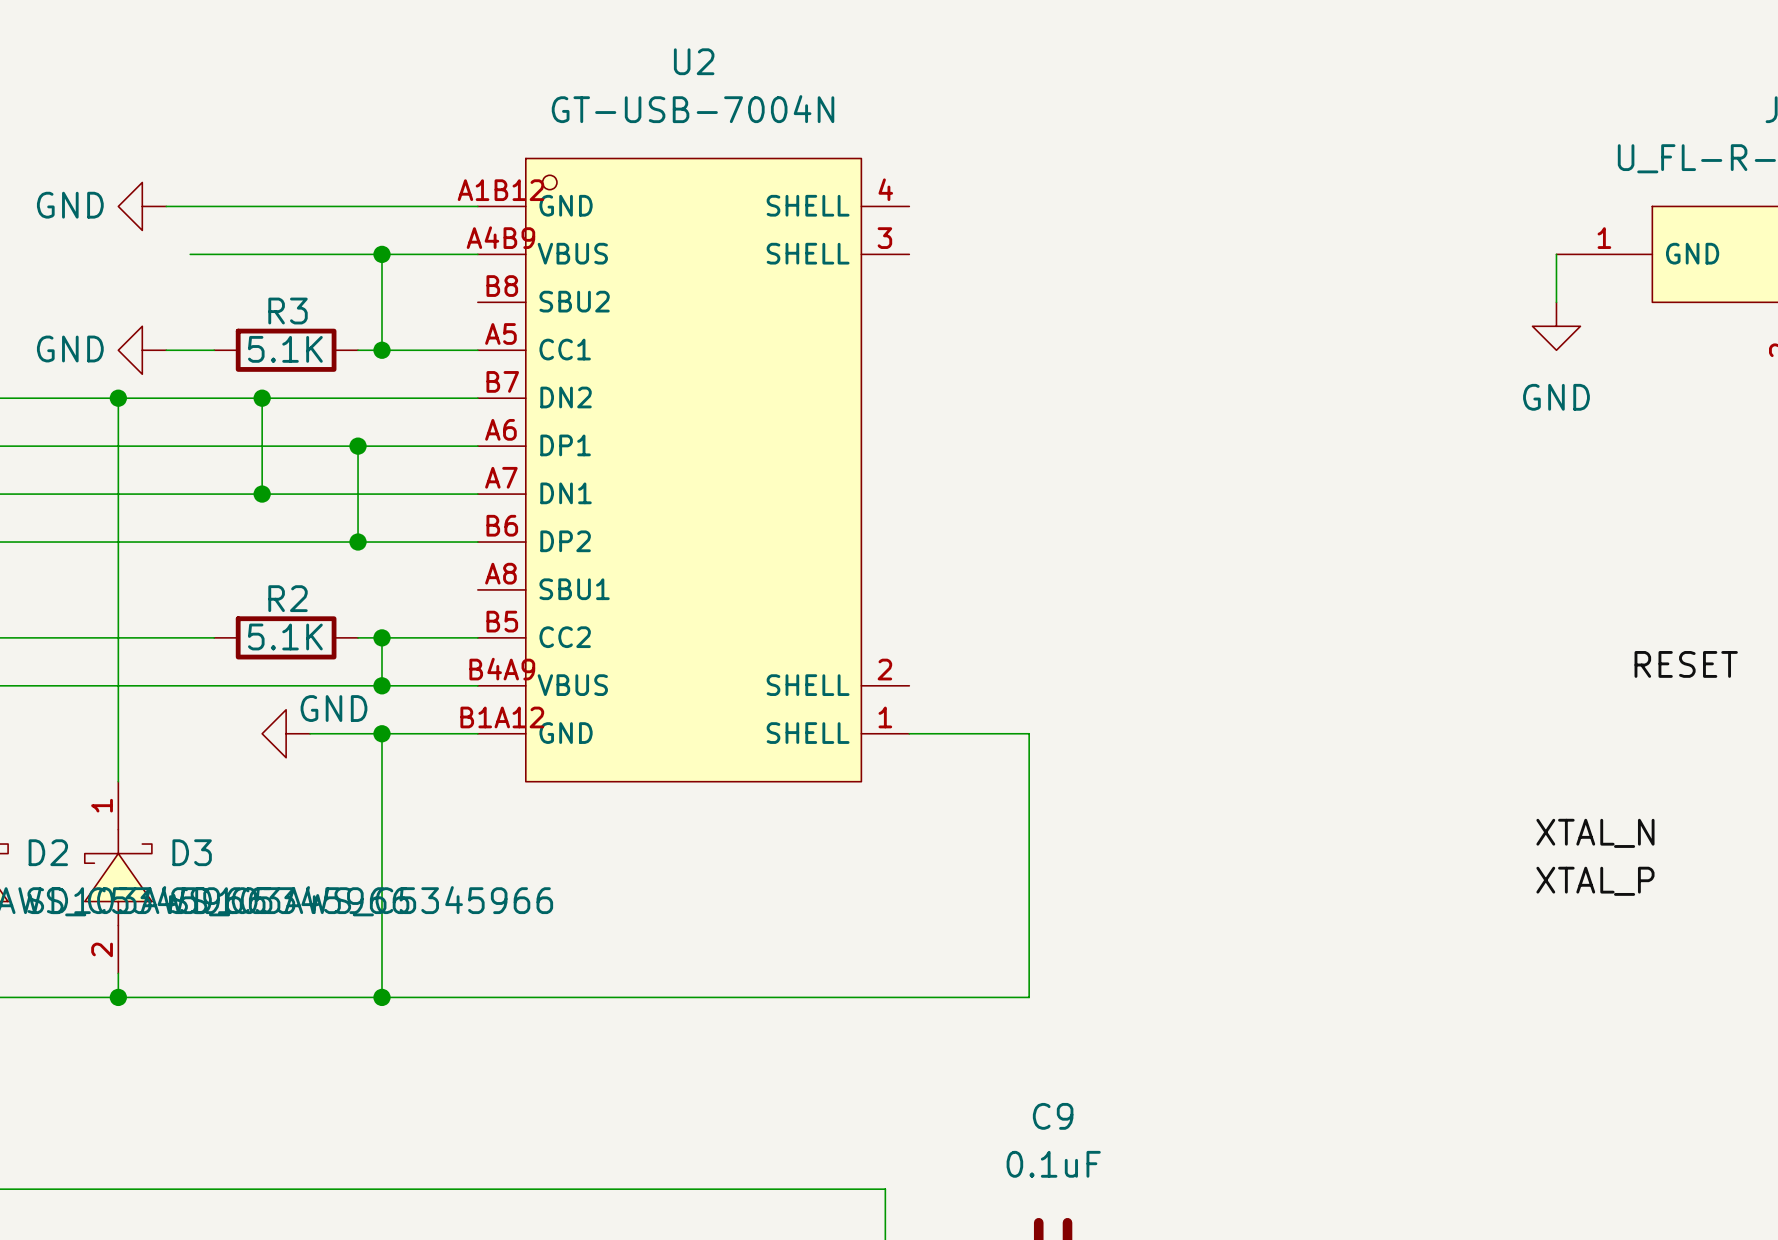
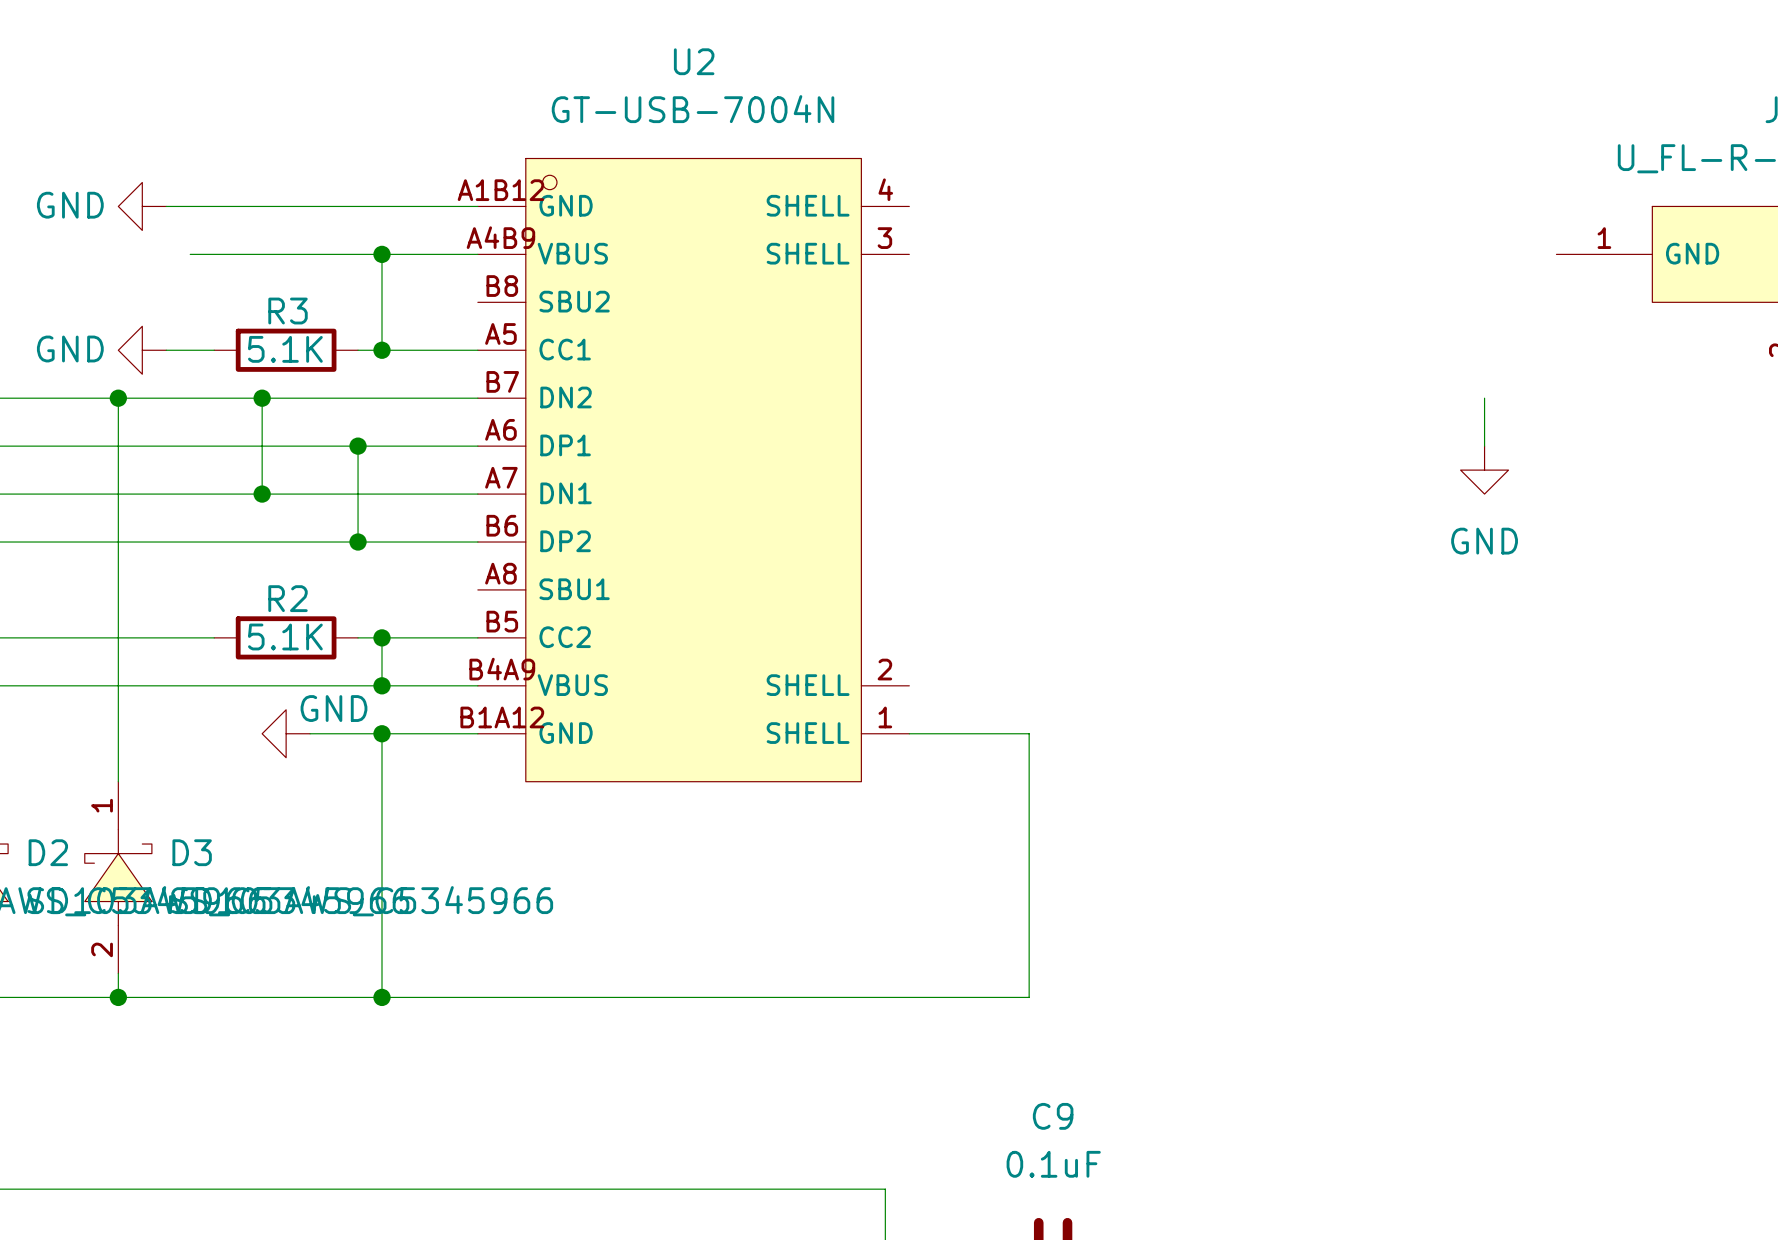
wire: (1556, 254) (1556, 302) -> (1484, 398) (1484, 446)
power symbol position: GND (1556, 326) -> GND (1484, 470)
label: RESET (1686, 664) -> none
label: XTAL_N (1595, 833) -> none
label: XTAL_P (1595, 881) -> none

